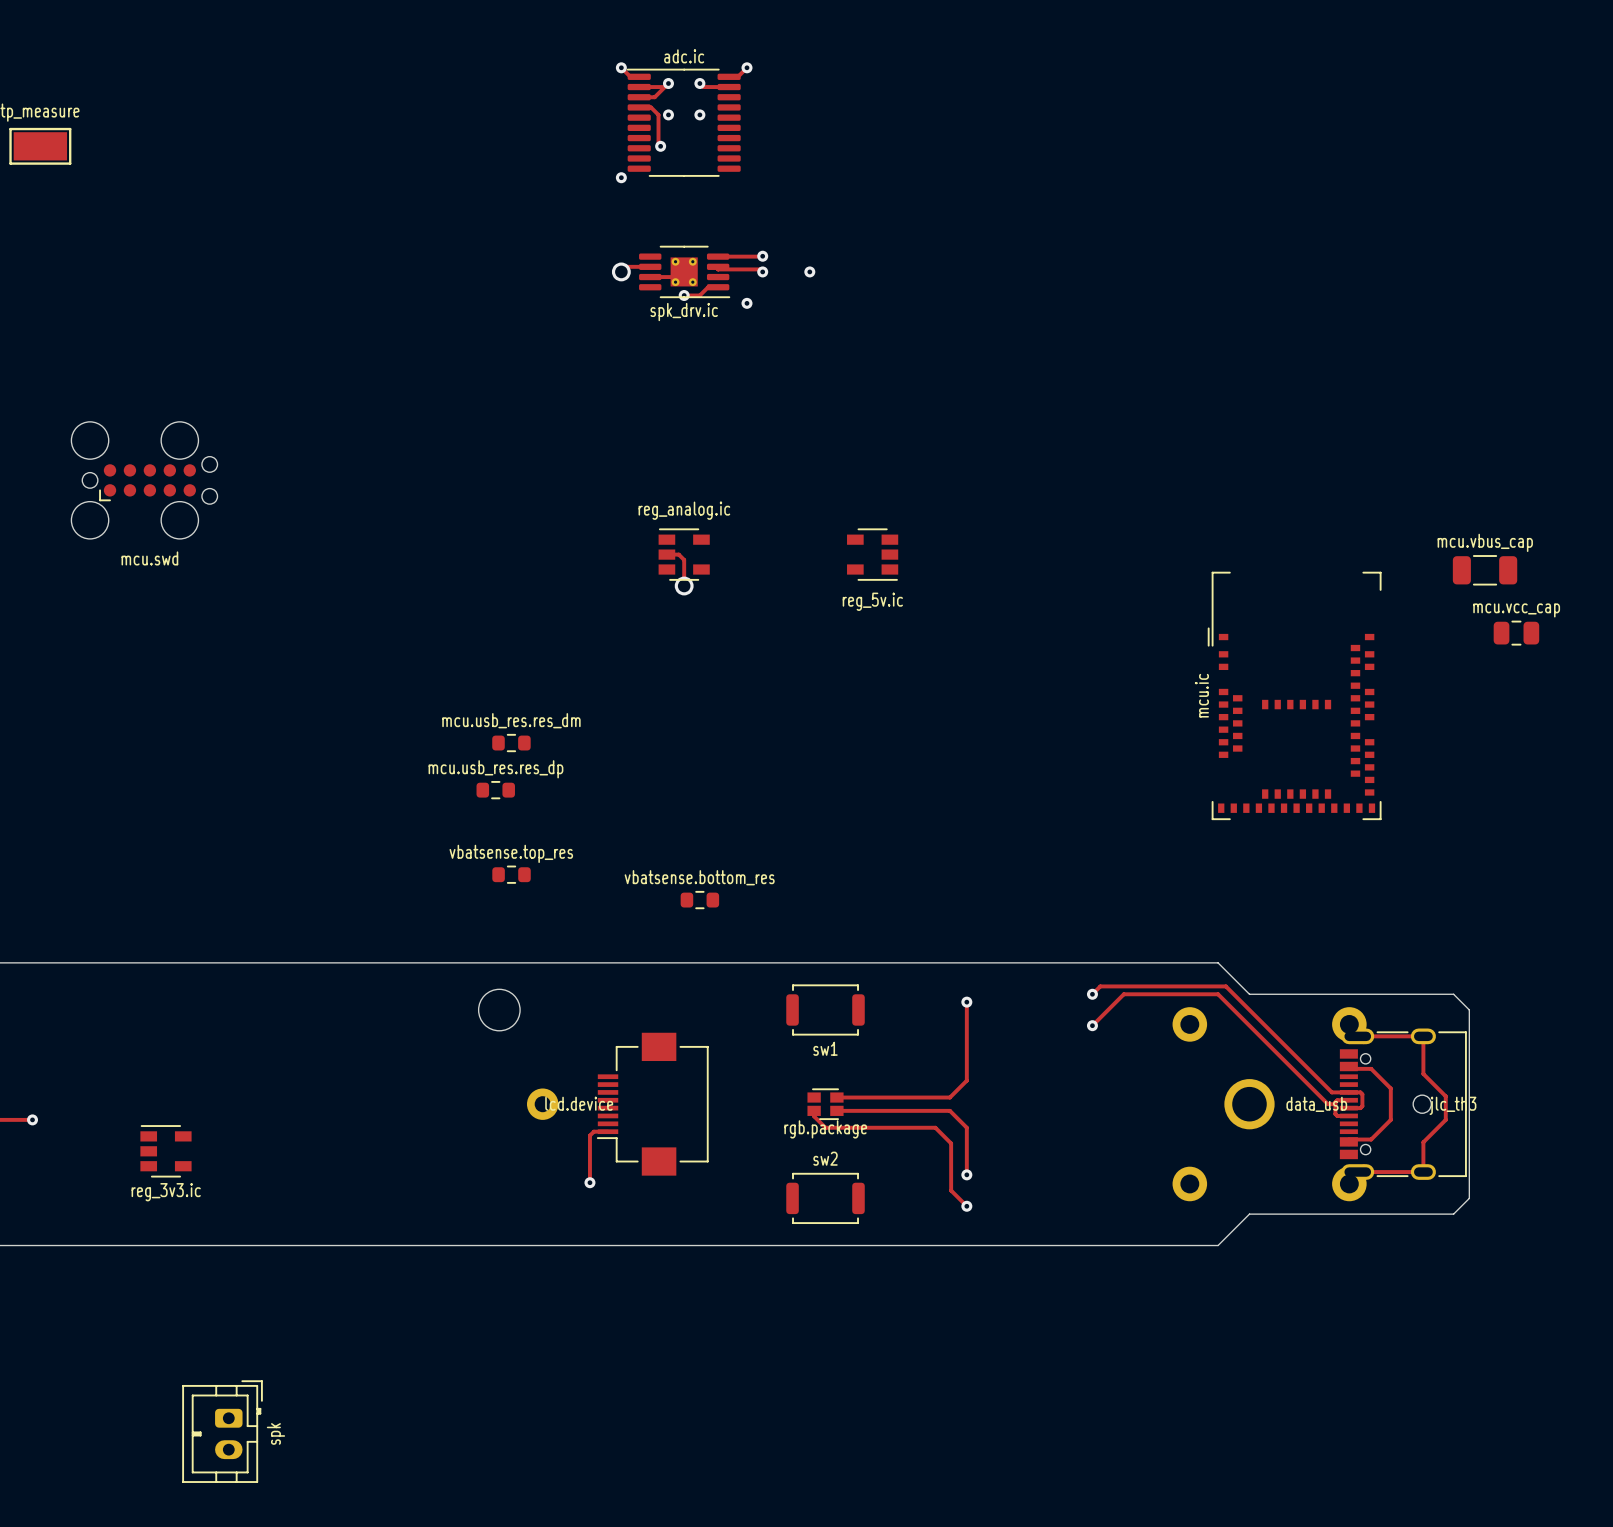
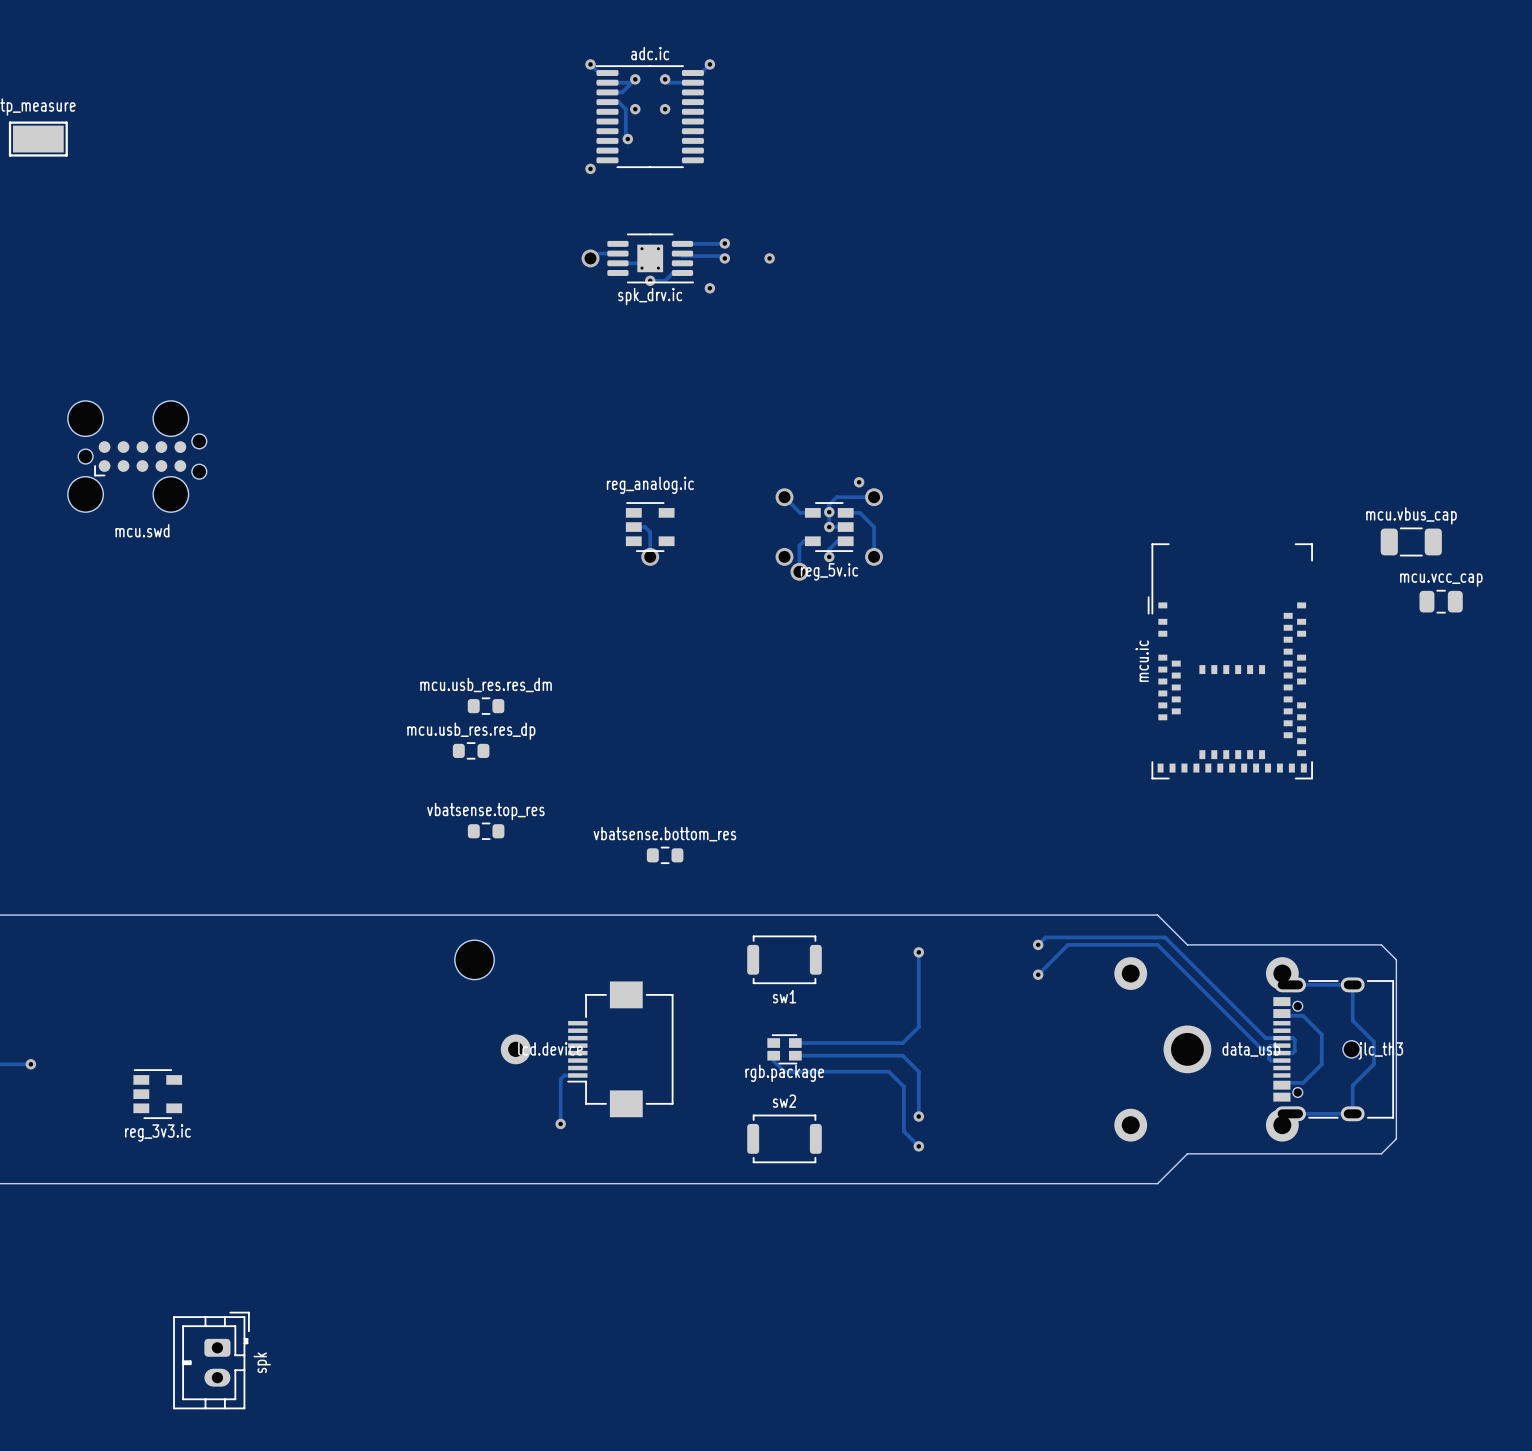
via: none -> (859, 482)
track: none -> (784, 497) (800, 512) (812, 512)
via: none -> (784, 497)
track: none -> (874, 497) (836, 497) (829, 504) (829, 527) (845, 527)
via: none -> (874, 497)
via: none -> (829, 512)
track: none -> (845, 512) (859, 512) (874, 527) (874, 556)
via: none -> (829, 527)
track: none -> (812, 541) (803, 541) (799, 545) (799, 571)
track: none -> (845, 541) (837, 541) (829, 549) (829, 556)
via: none -> (784, 556)
via: none -> (829, 556)
via: none -> (874, 556)
via: none -> (799, 571)

